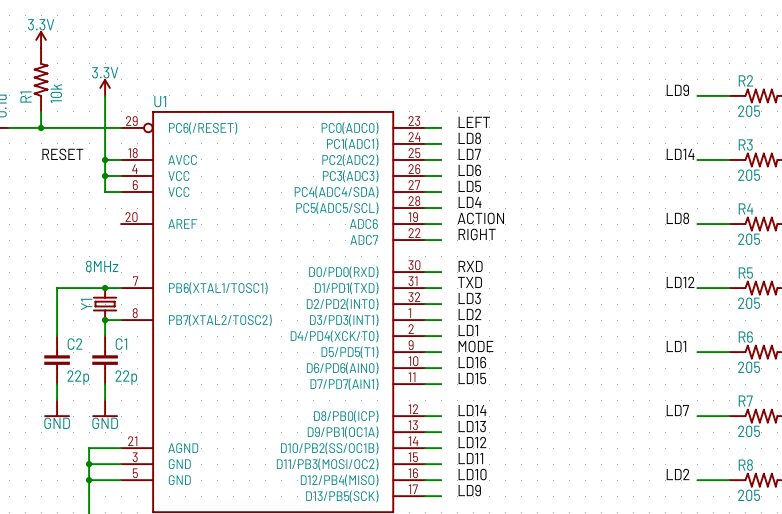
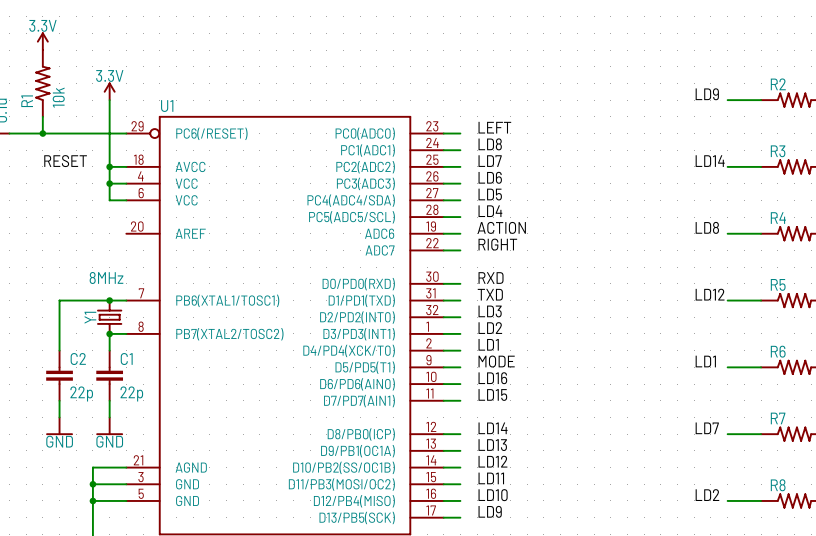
R2 value: 205 (749, 111) -> none
R3 value: 205 (749, 175) -> none
R4 value: 205 (749, 239) -> none
R5 value: 205 (749, 303) -> none
R6 value: 205 (749, 367) -> none
R7 value: 205 (749, 431) -> none
R8 value: 205 (749, 495) -> none

